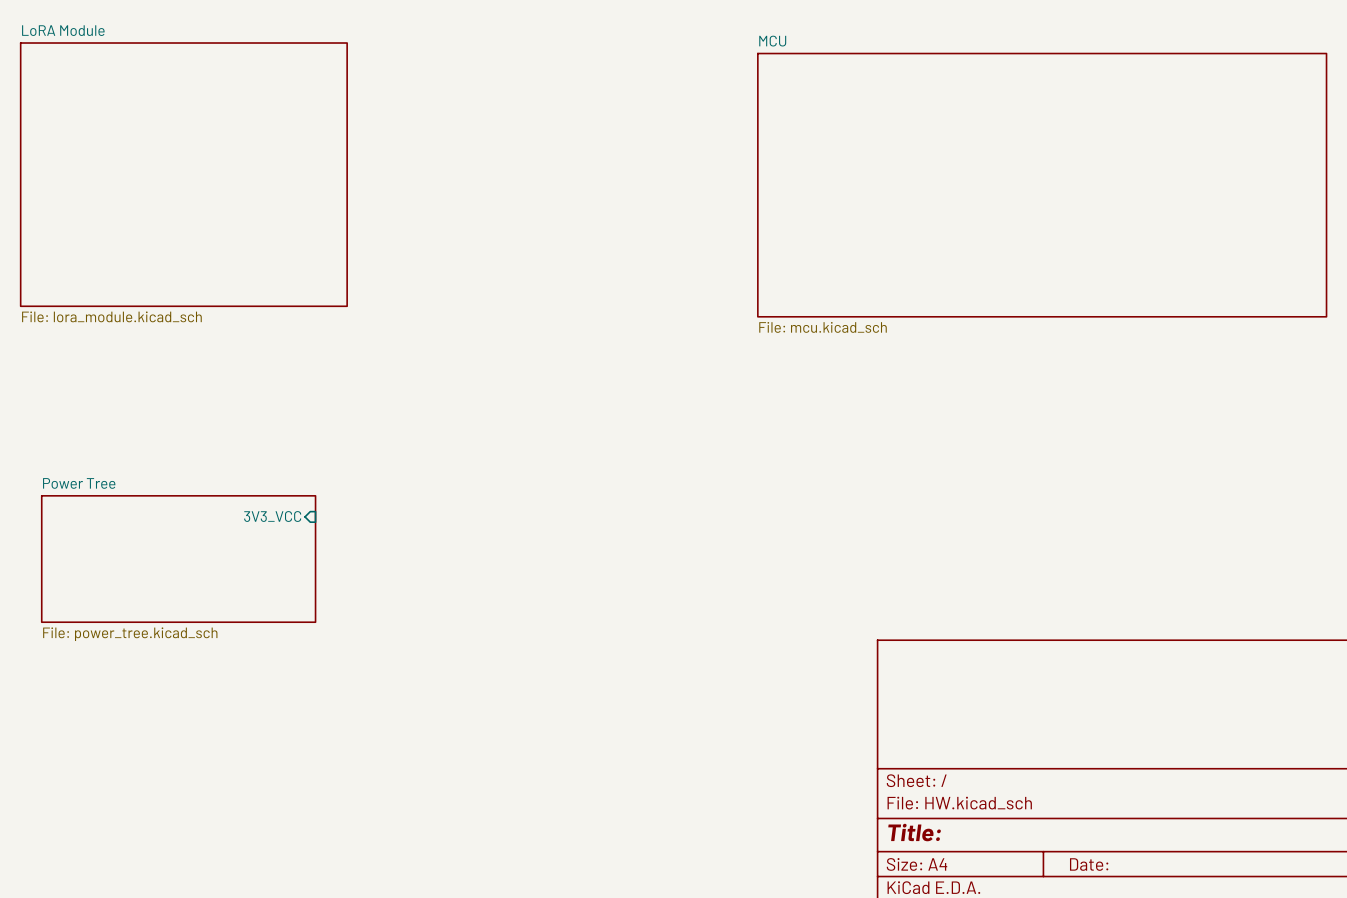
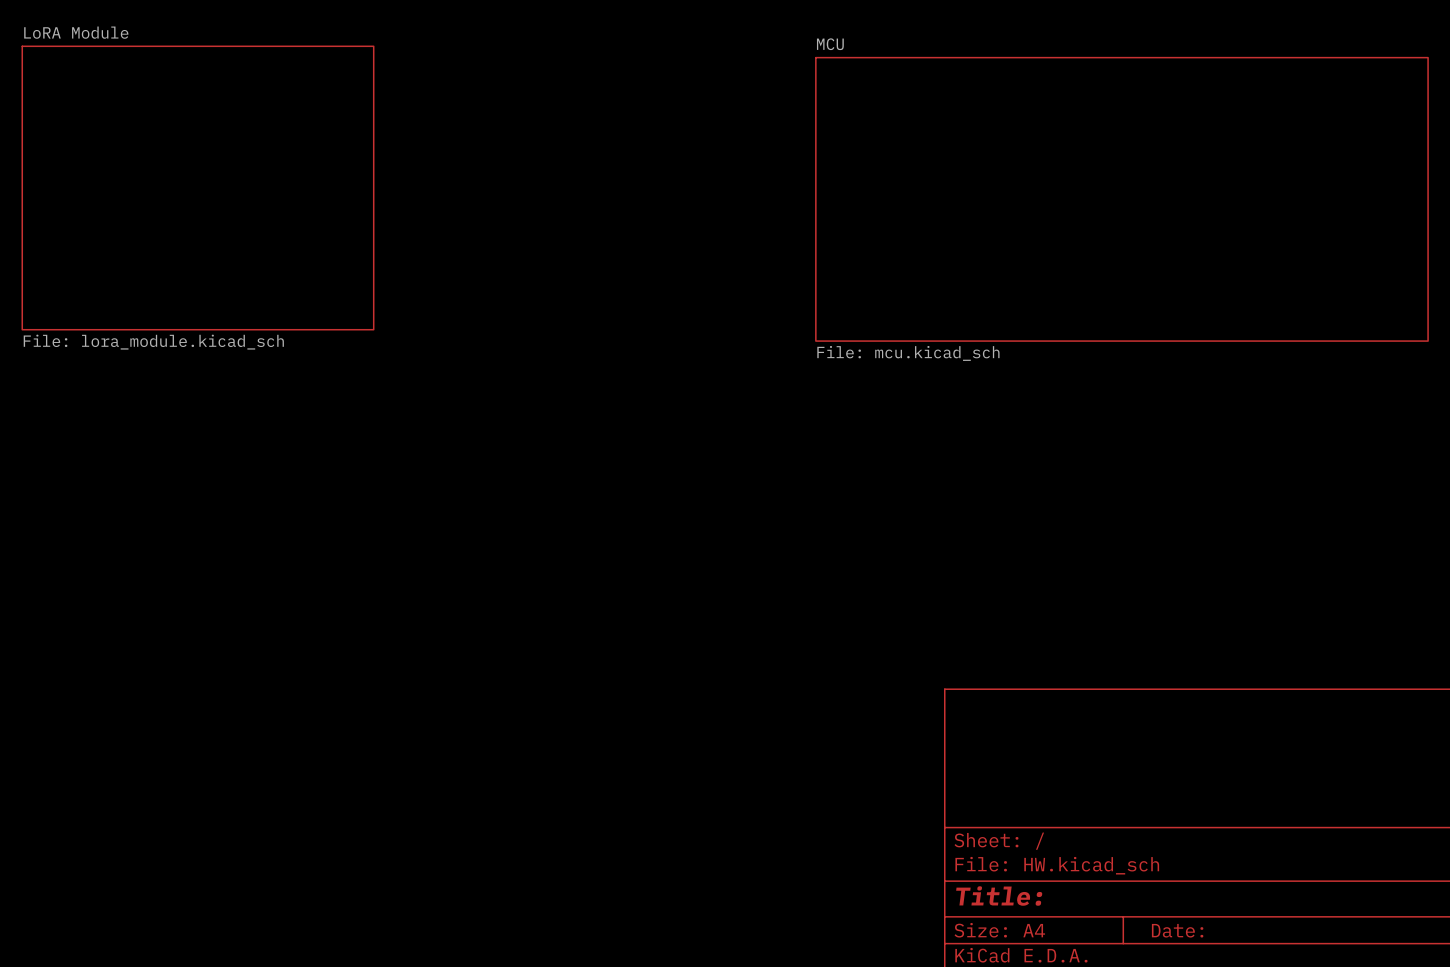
sheet pin: 3V3_VCC (272, 516) -> none
sheet Power Tree: File: power_tree.kicad_sch (178, 559) -> none

